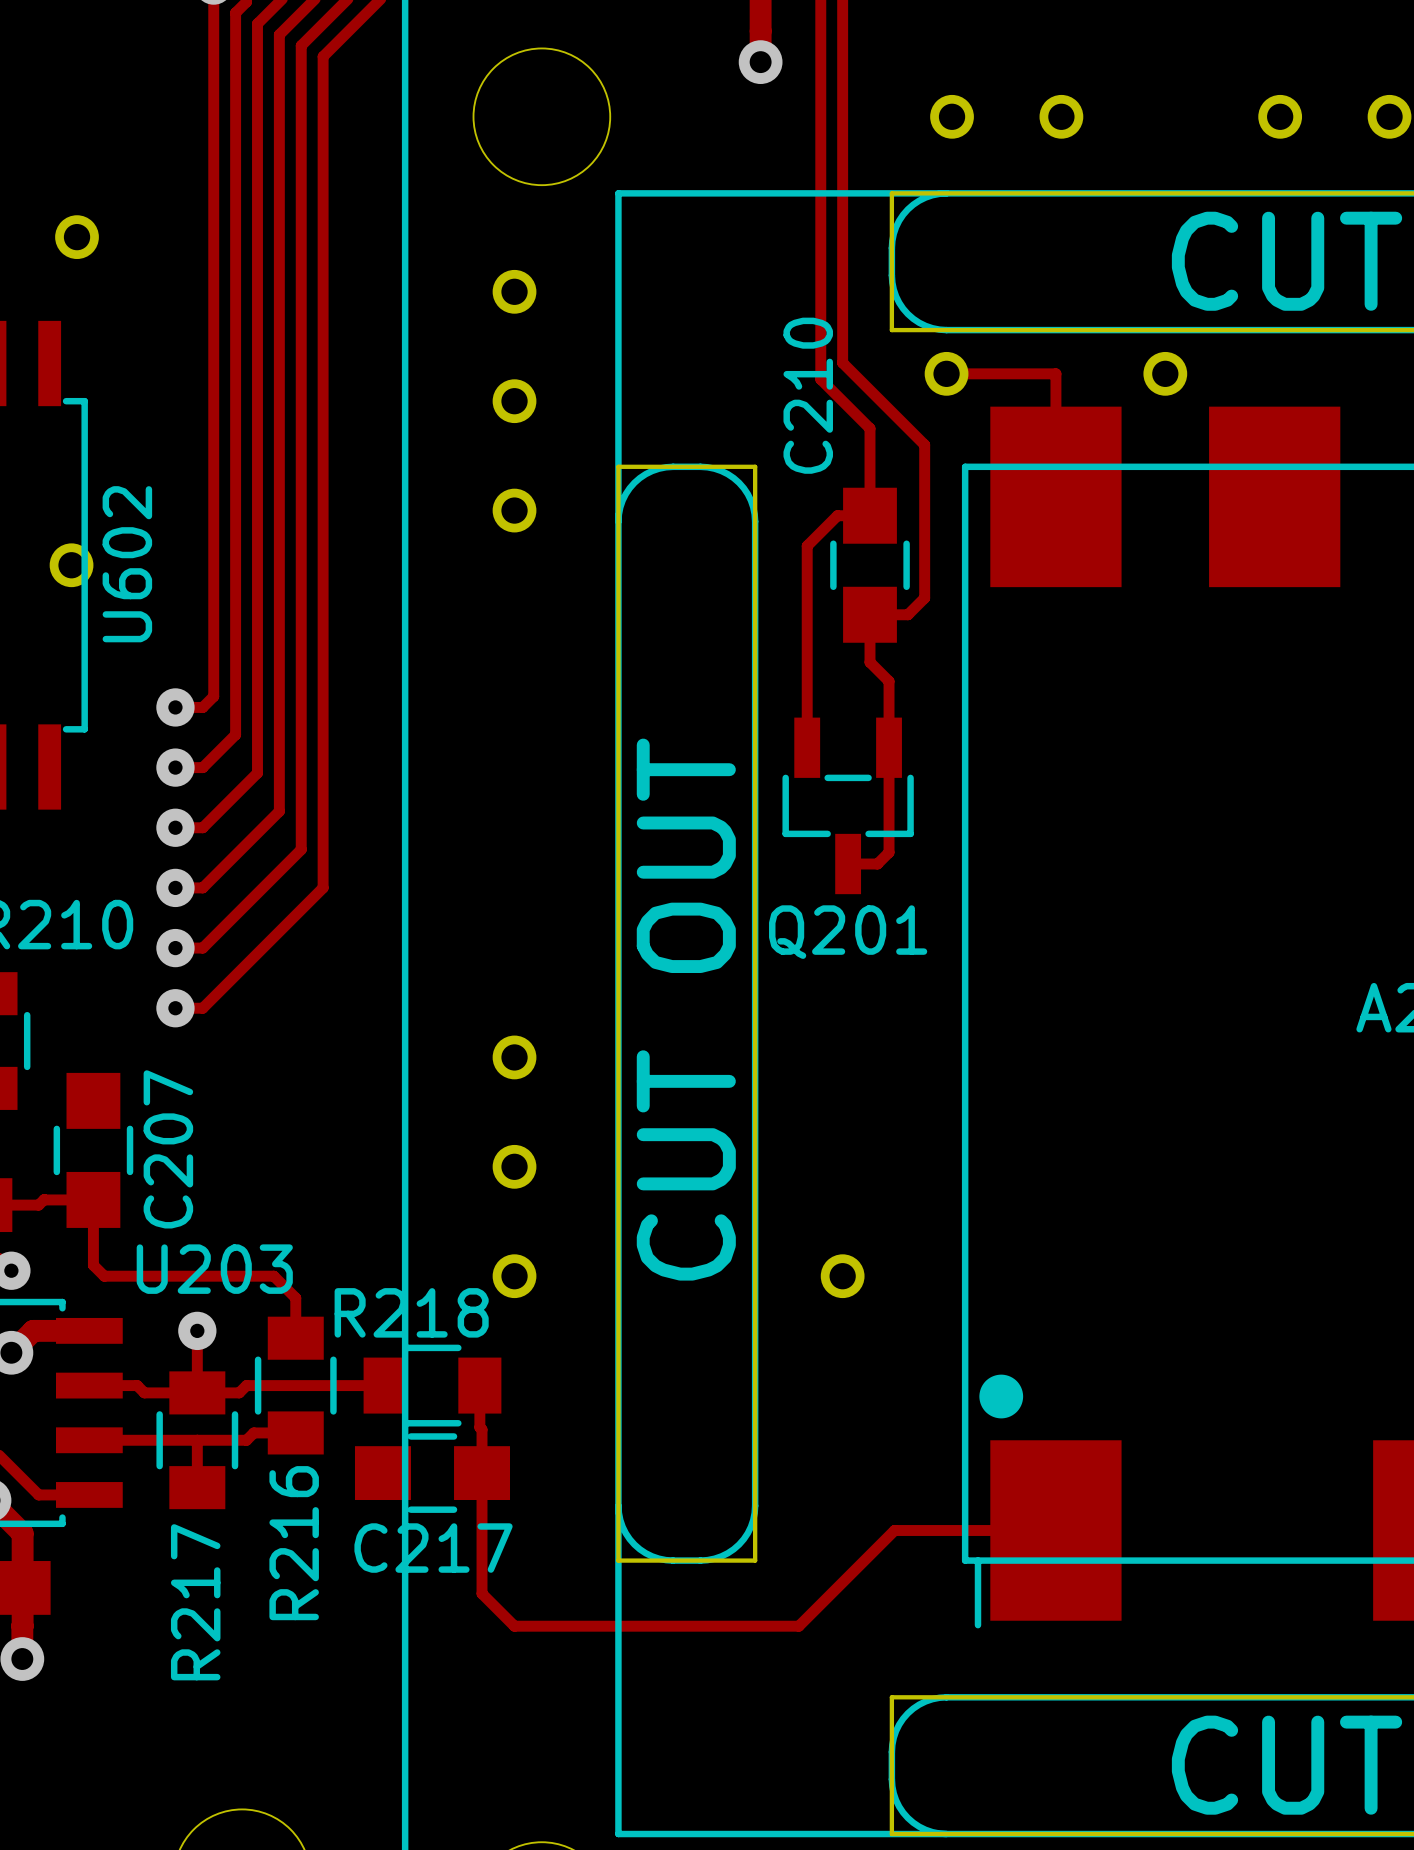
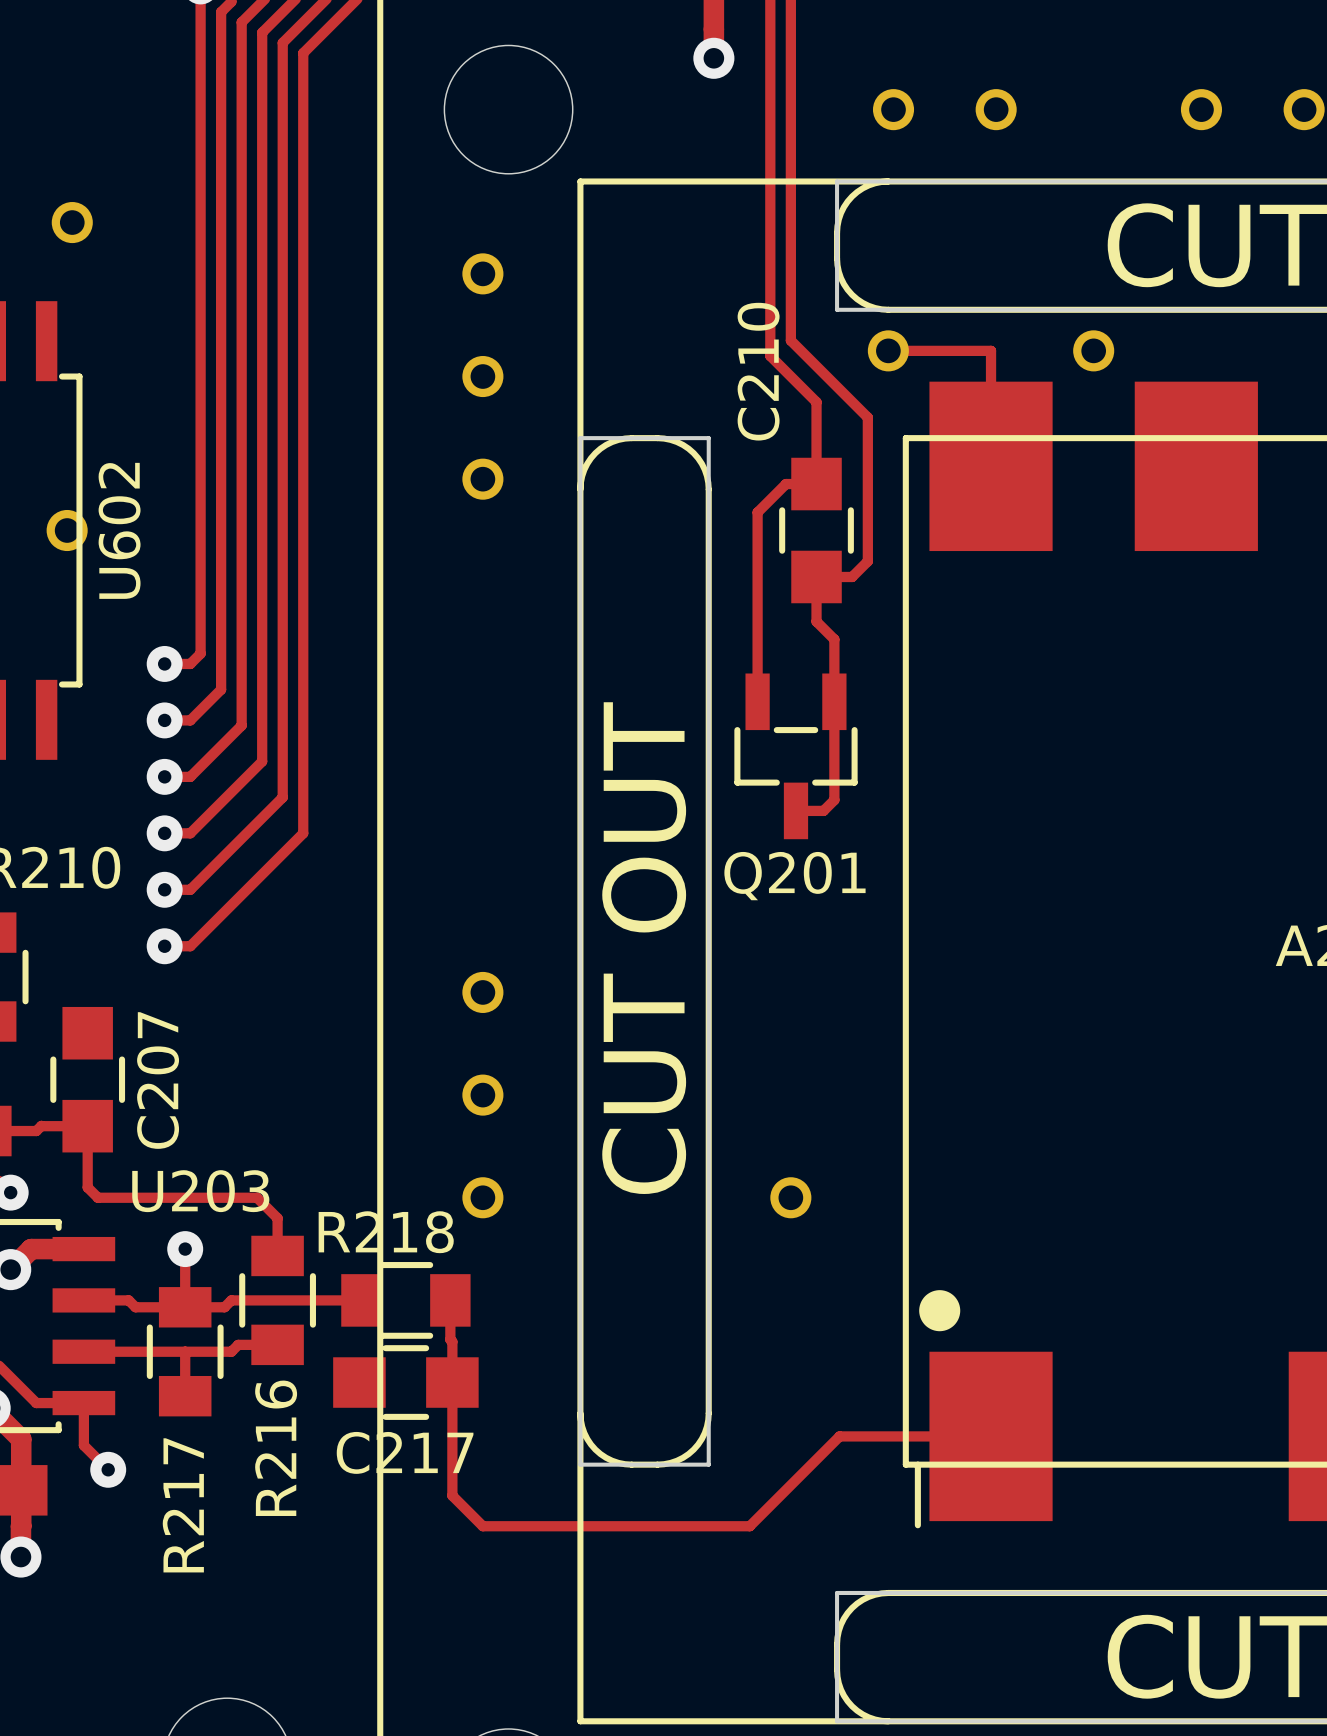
track: none -> (83, 1403) (83, 1445) (108, 1469)
via: none -> (108, 1469)

